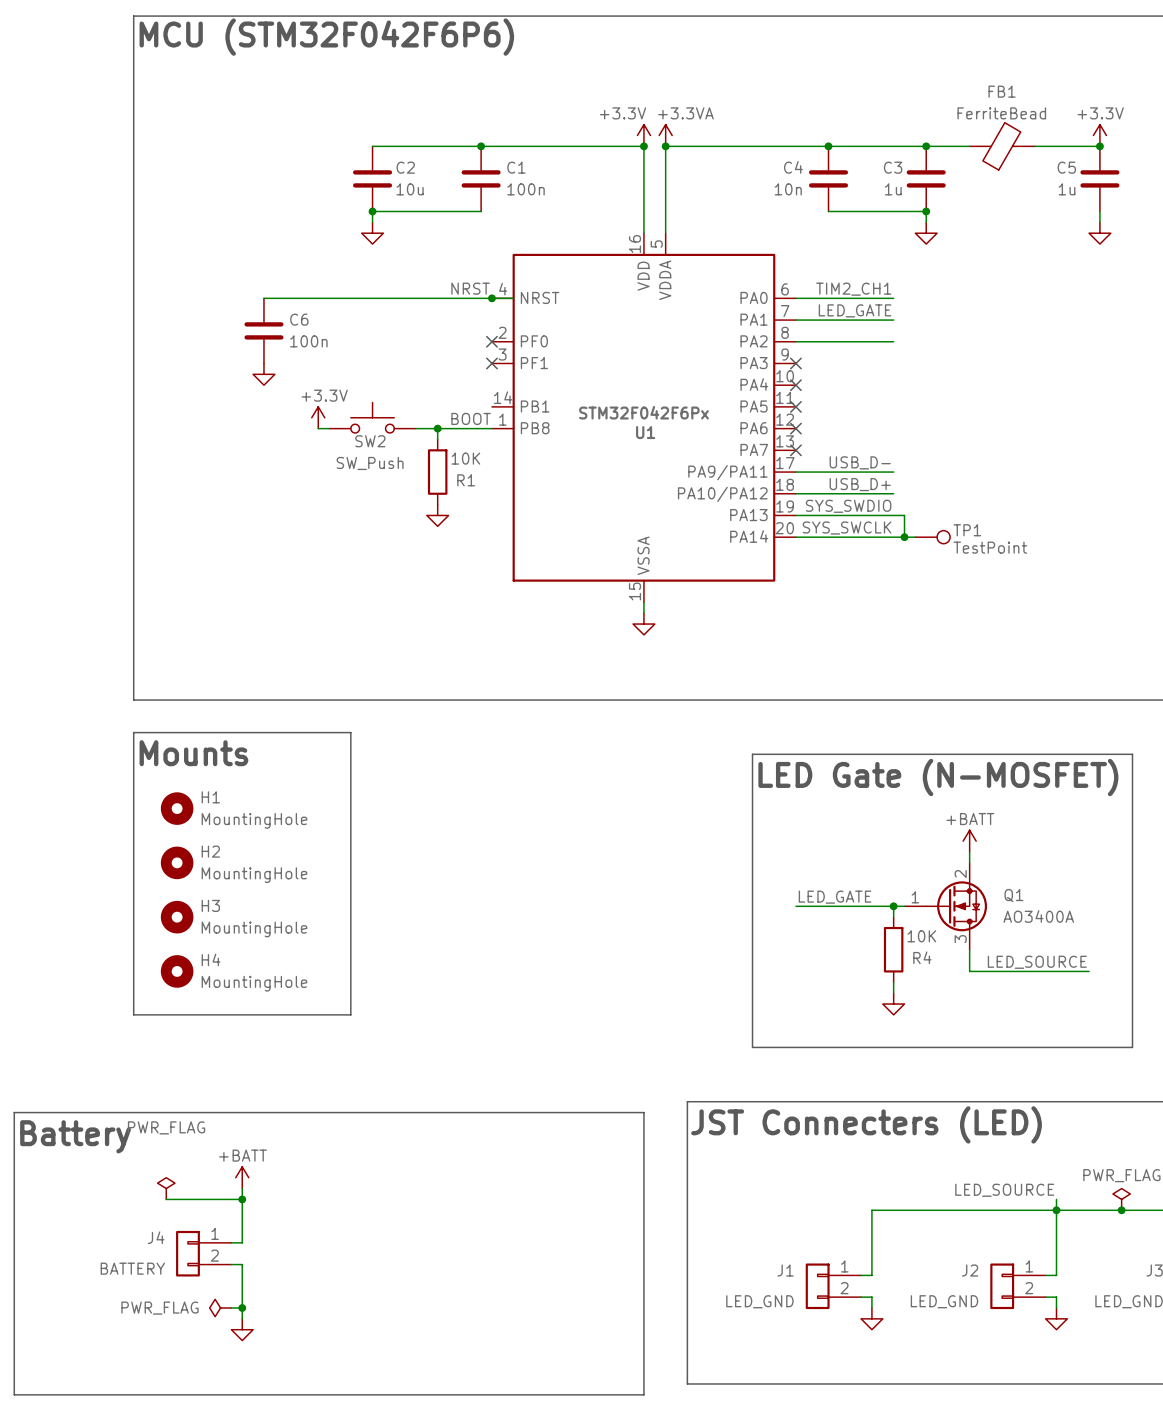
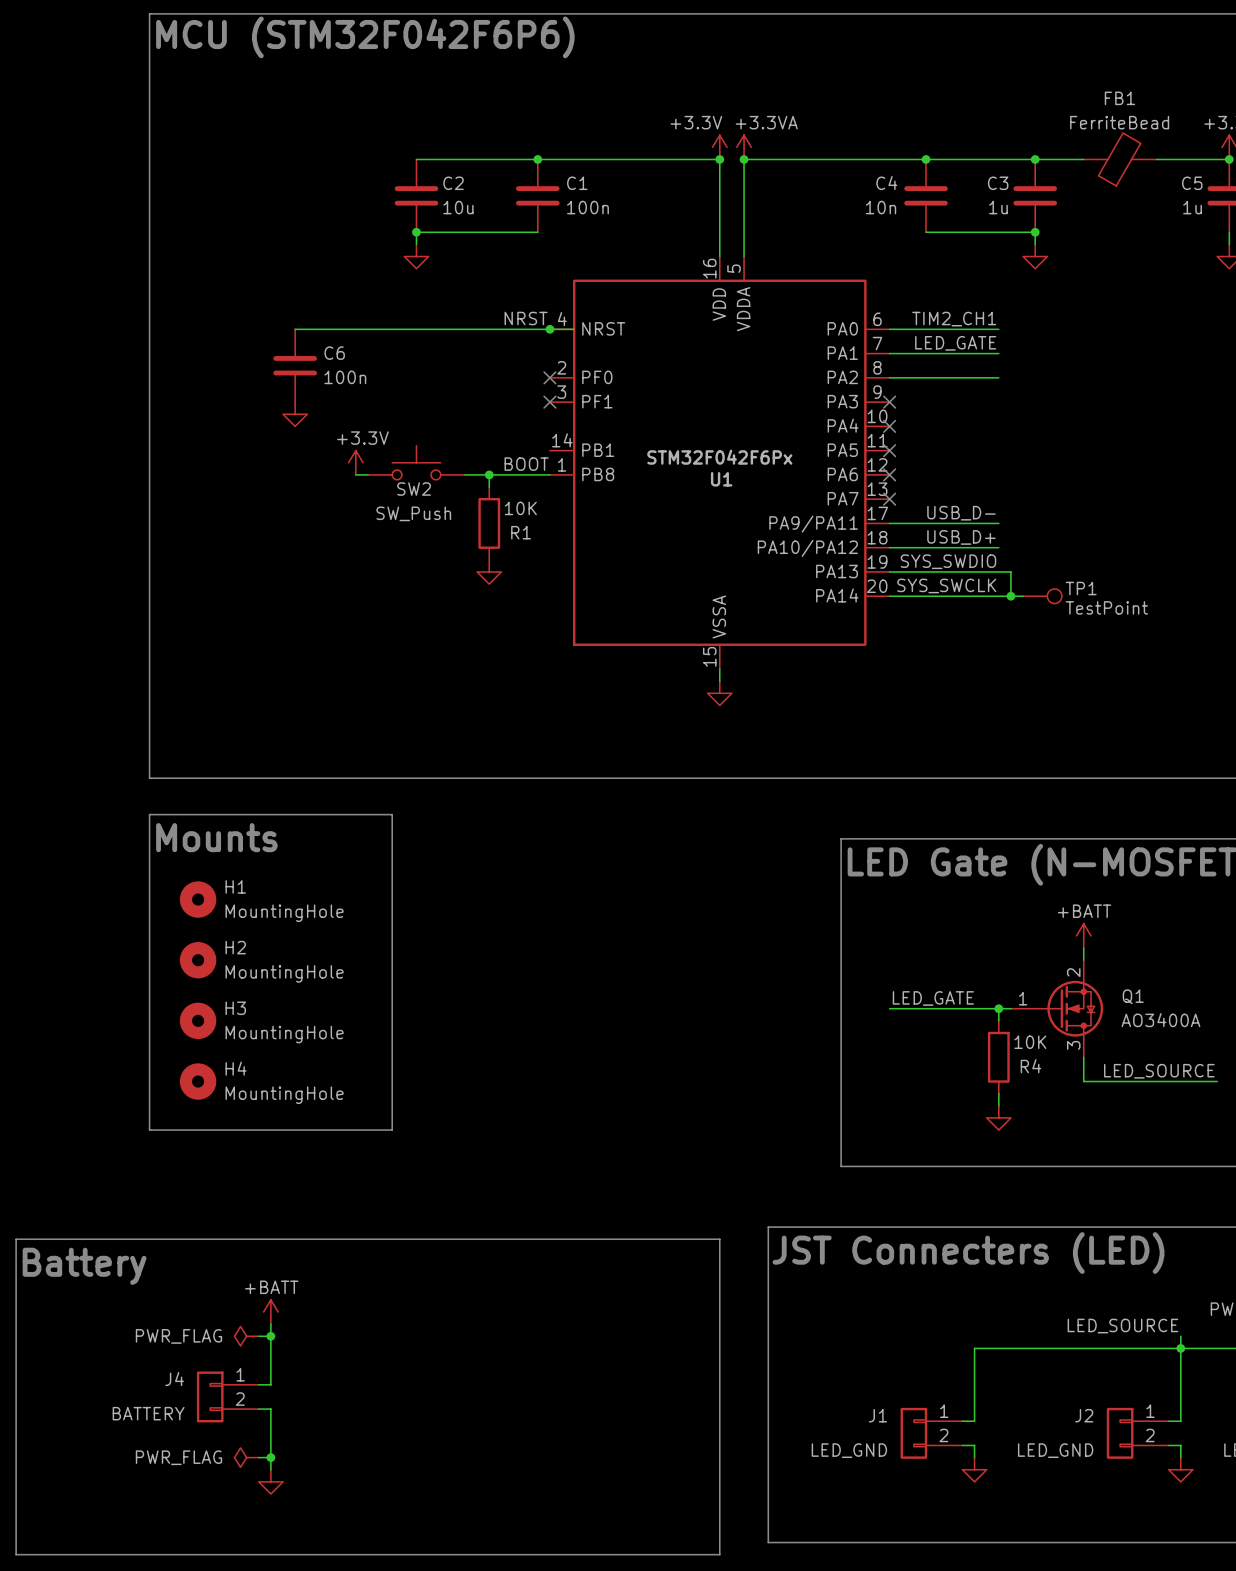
power symbol rotation: 0° (166, 1188) -> 90° counterclockwise (246, 1336)
power symbol position: PWR_FLAG (166, 1188) -> PWR_FLAG (246, 1336)
wire: (166, 1199) (231, 1199) -> none

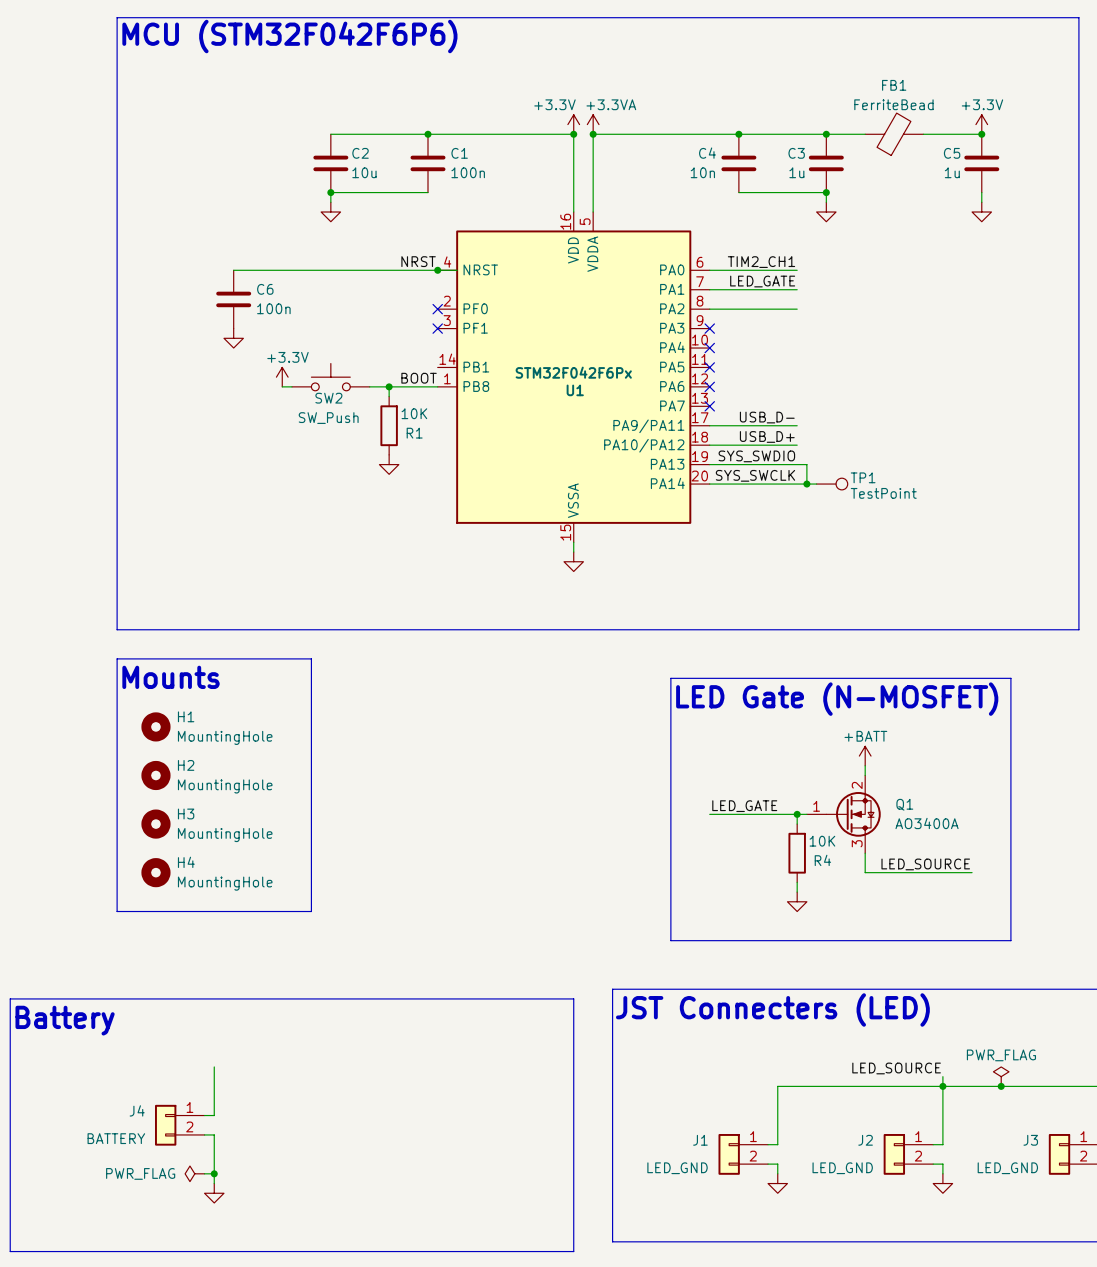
power symbol: +BATT (270, 1312) -> none
power symbol: PWR_FLAG (246, 1336) -> none
wire: (258, 1336) (270, 1336) -> none
junction: (270, 1336) -> none

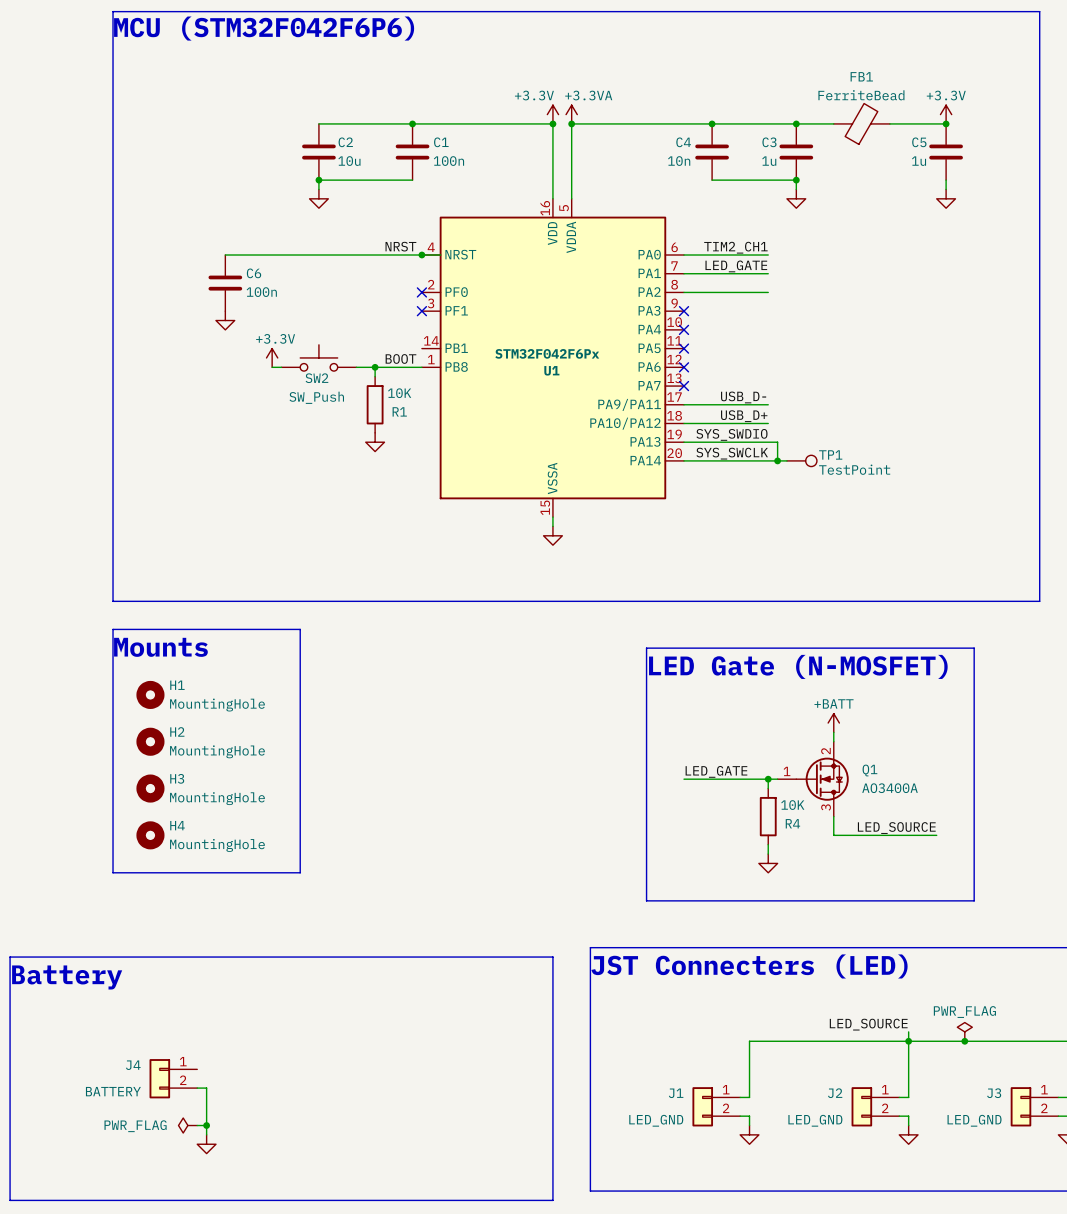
wire: (214, 1066) (214, 1115) (204, 1115) -> none

